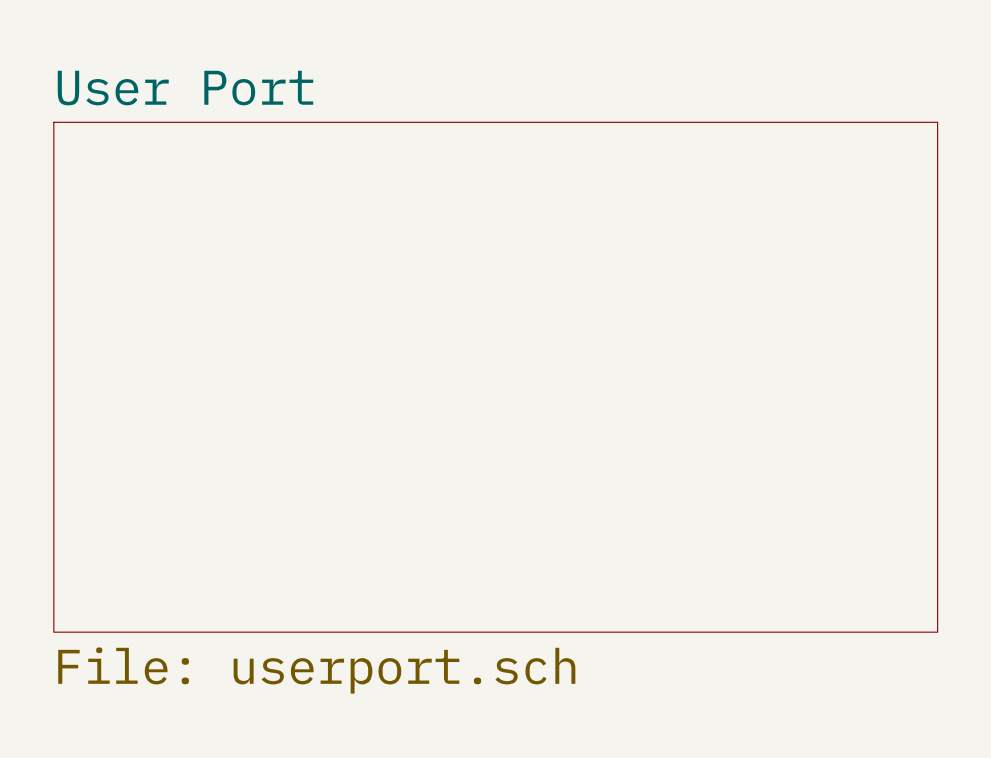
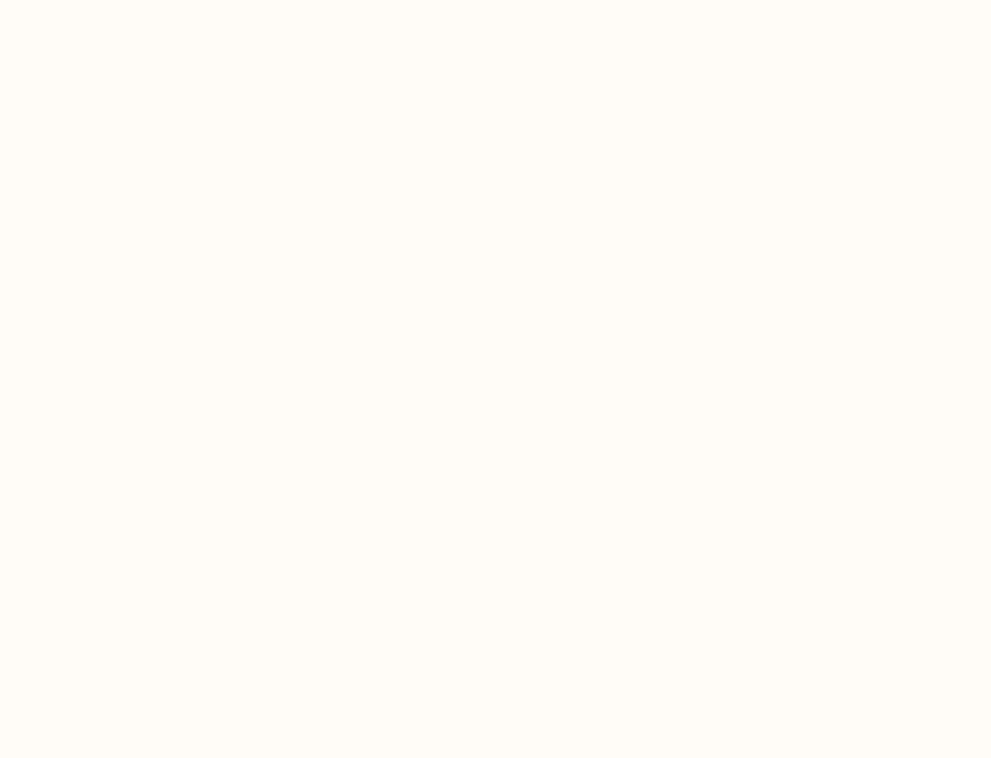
sheet User Port: File: userport.sch (495, 377) -> none

